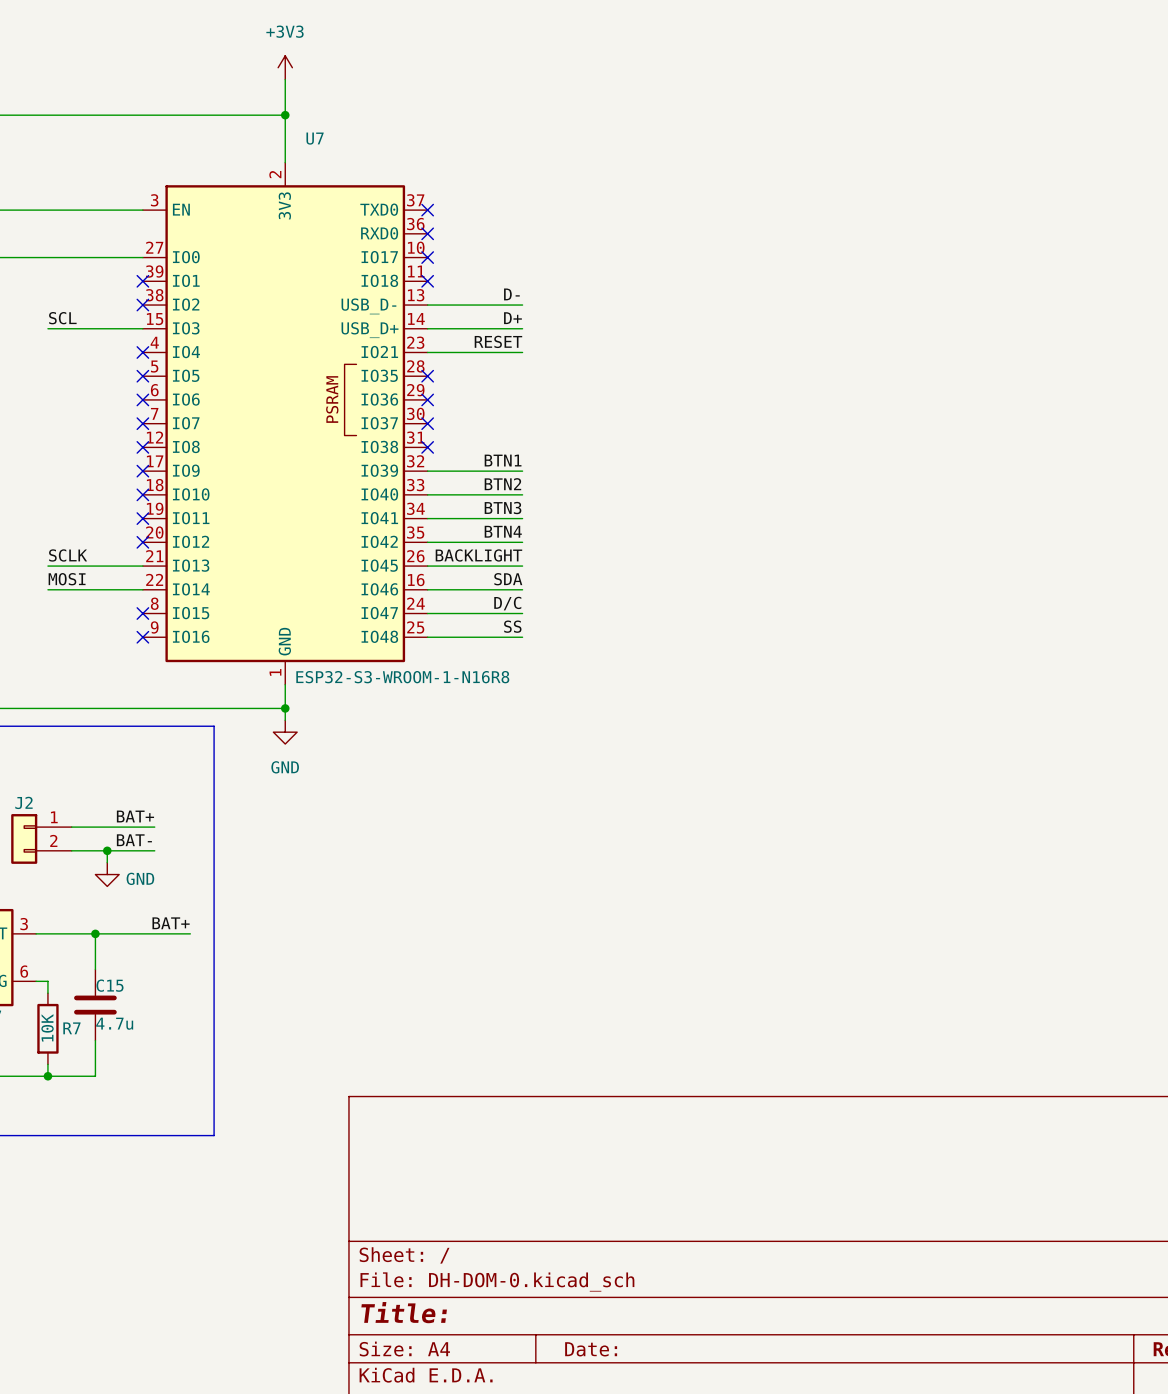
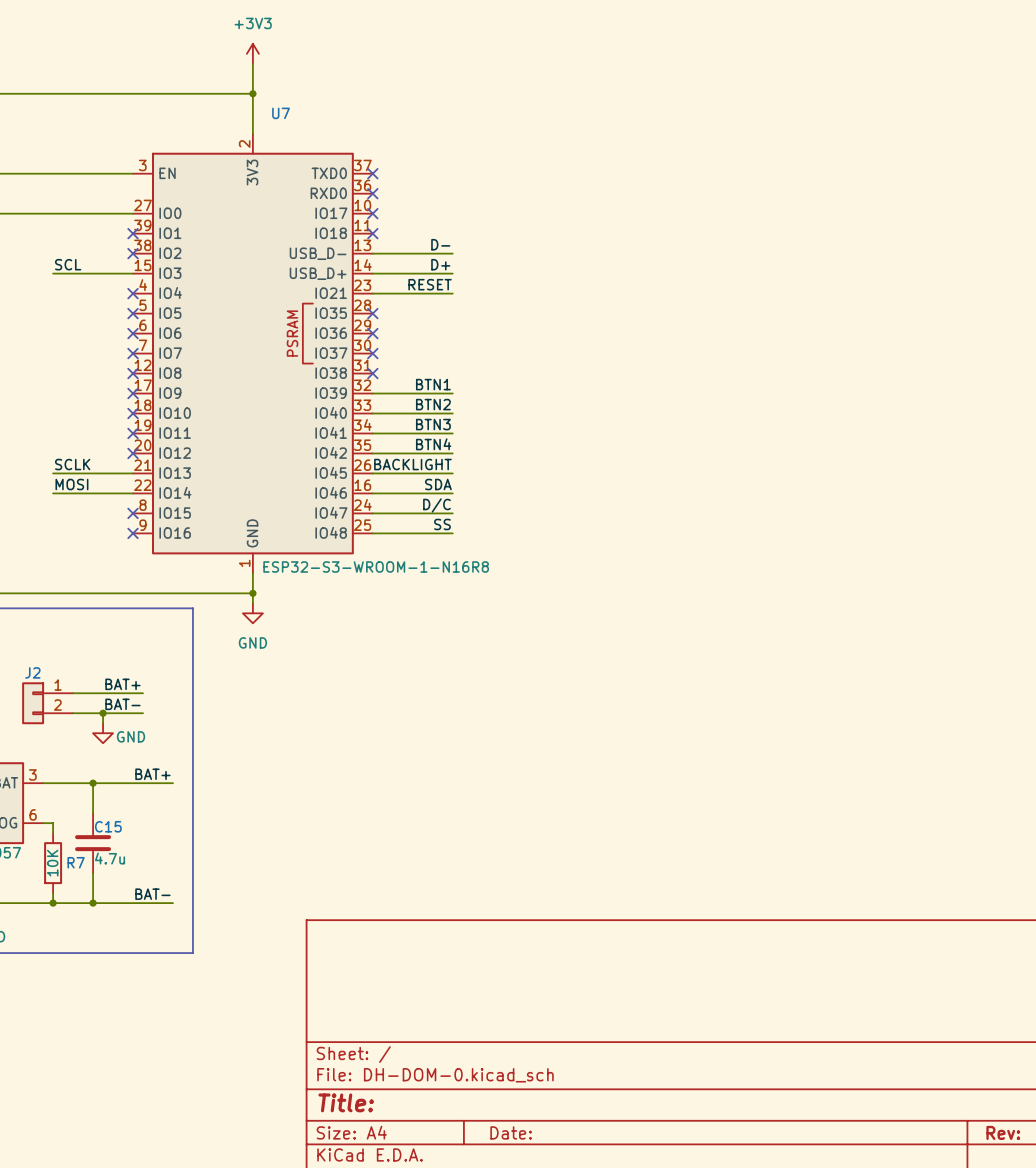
label: none -> BAT- (152, 894)
wire: none -> (93, 903) (172, 903)
junction: none -> (93, 903)

